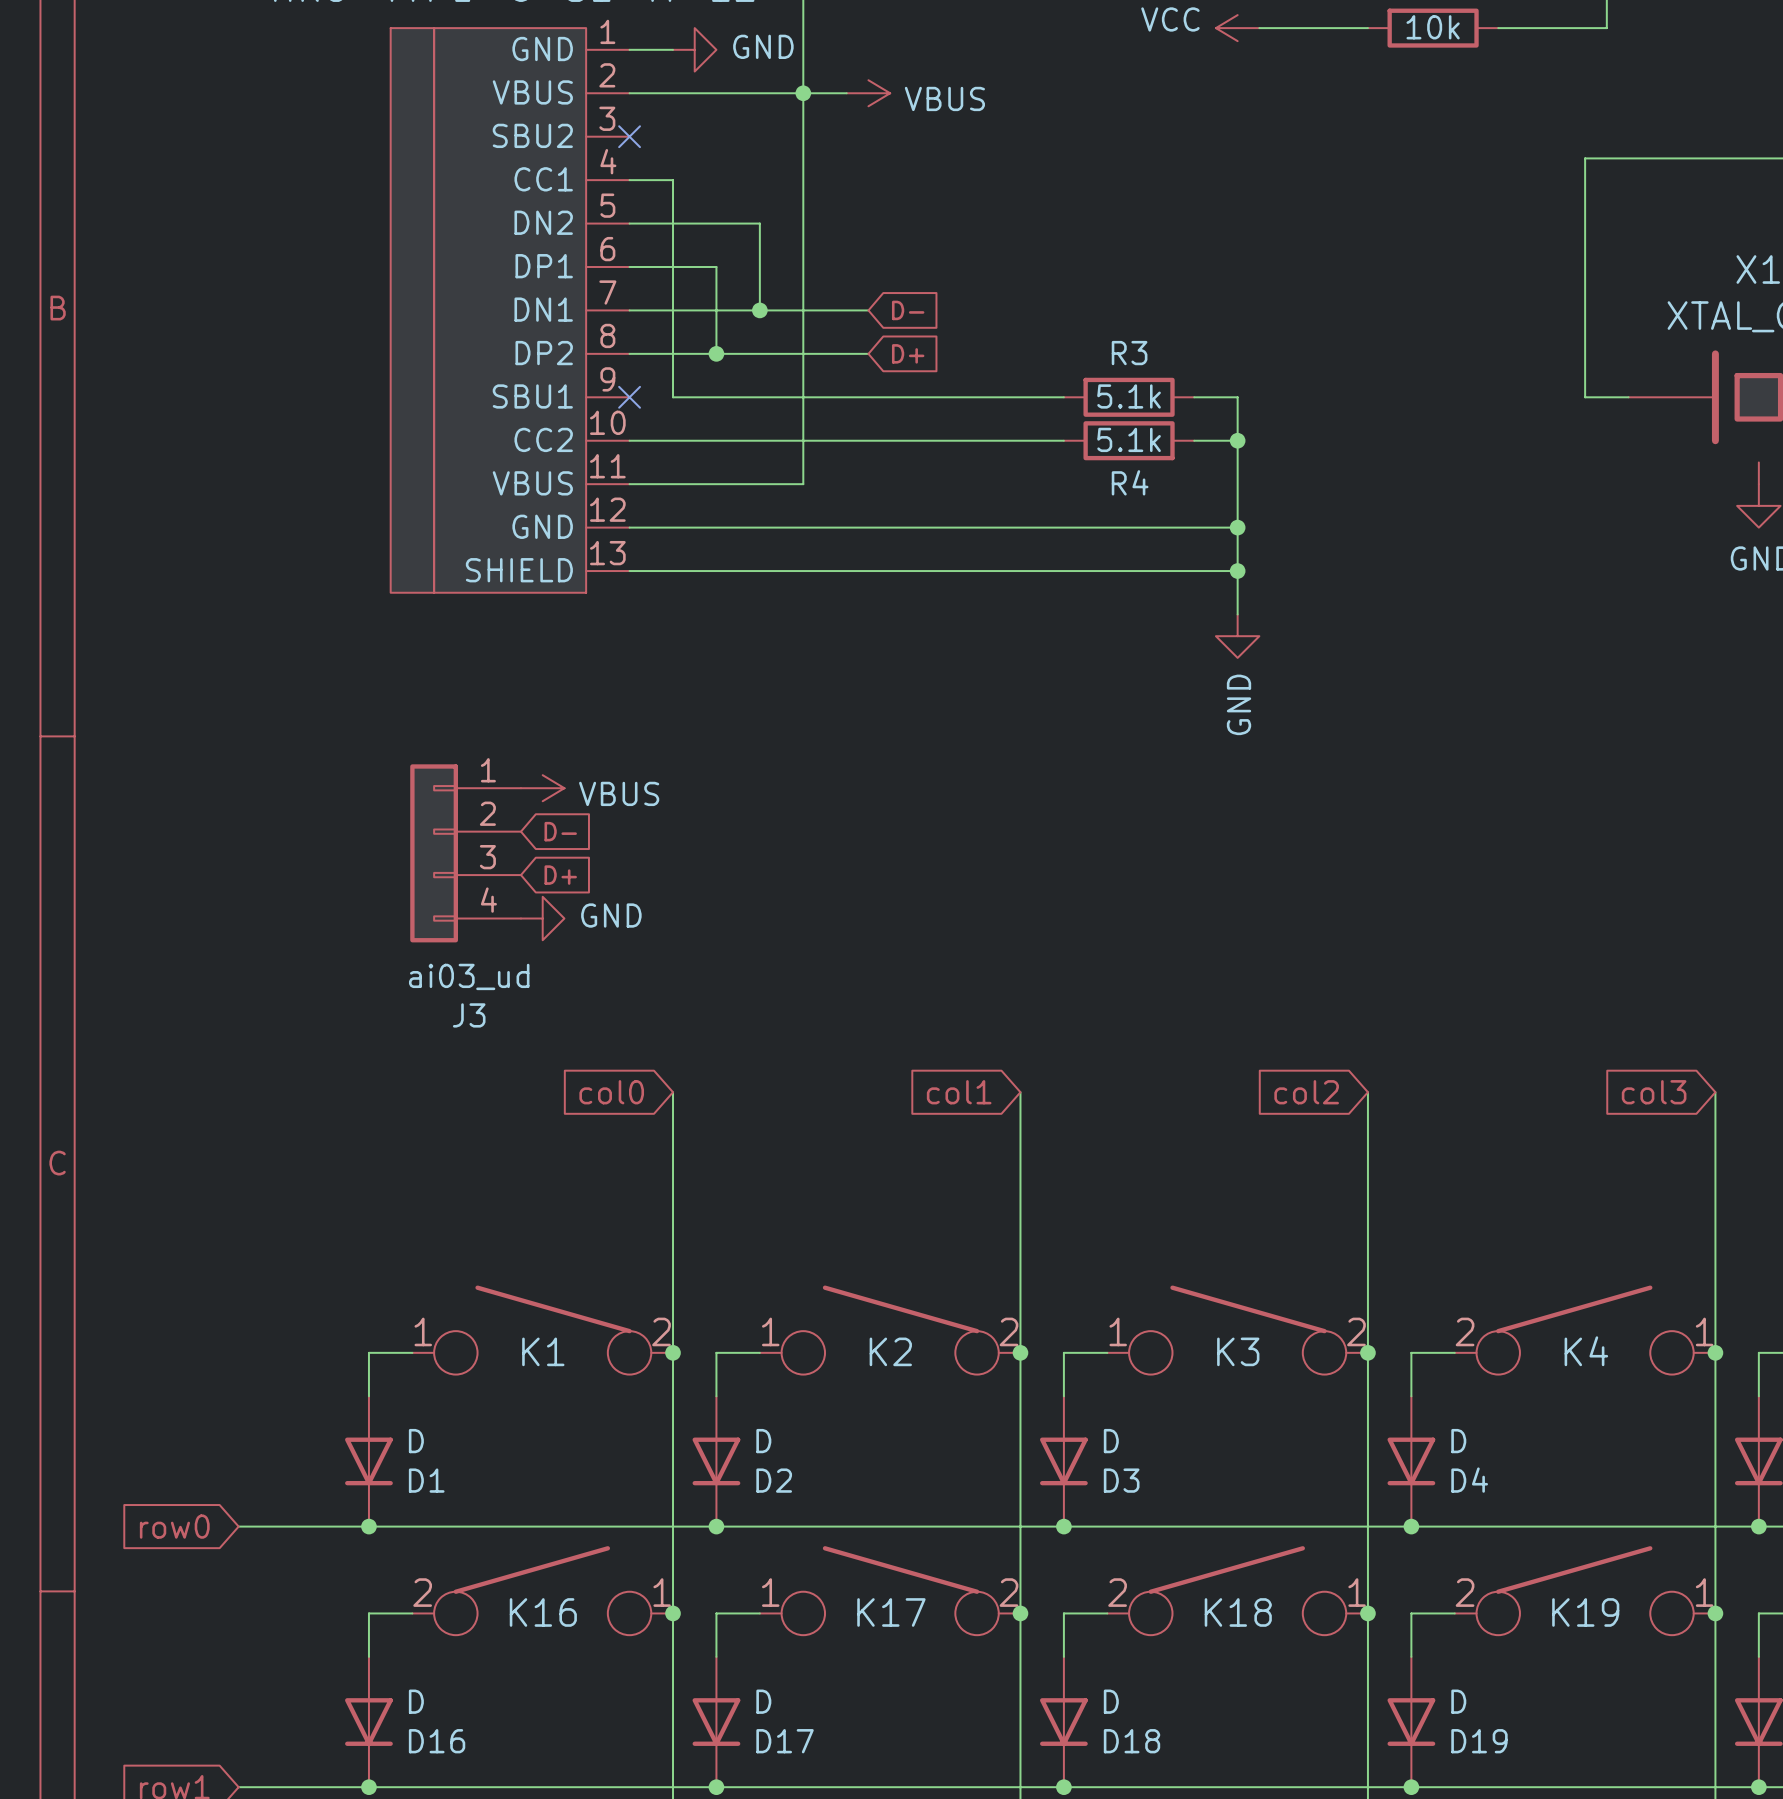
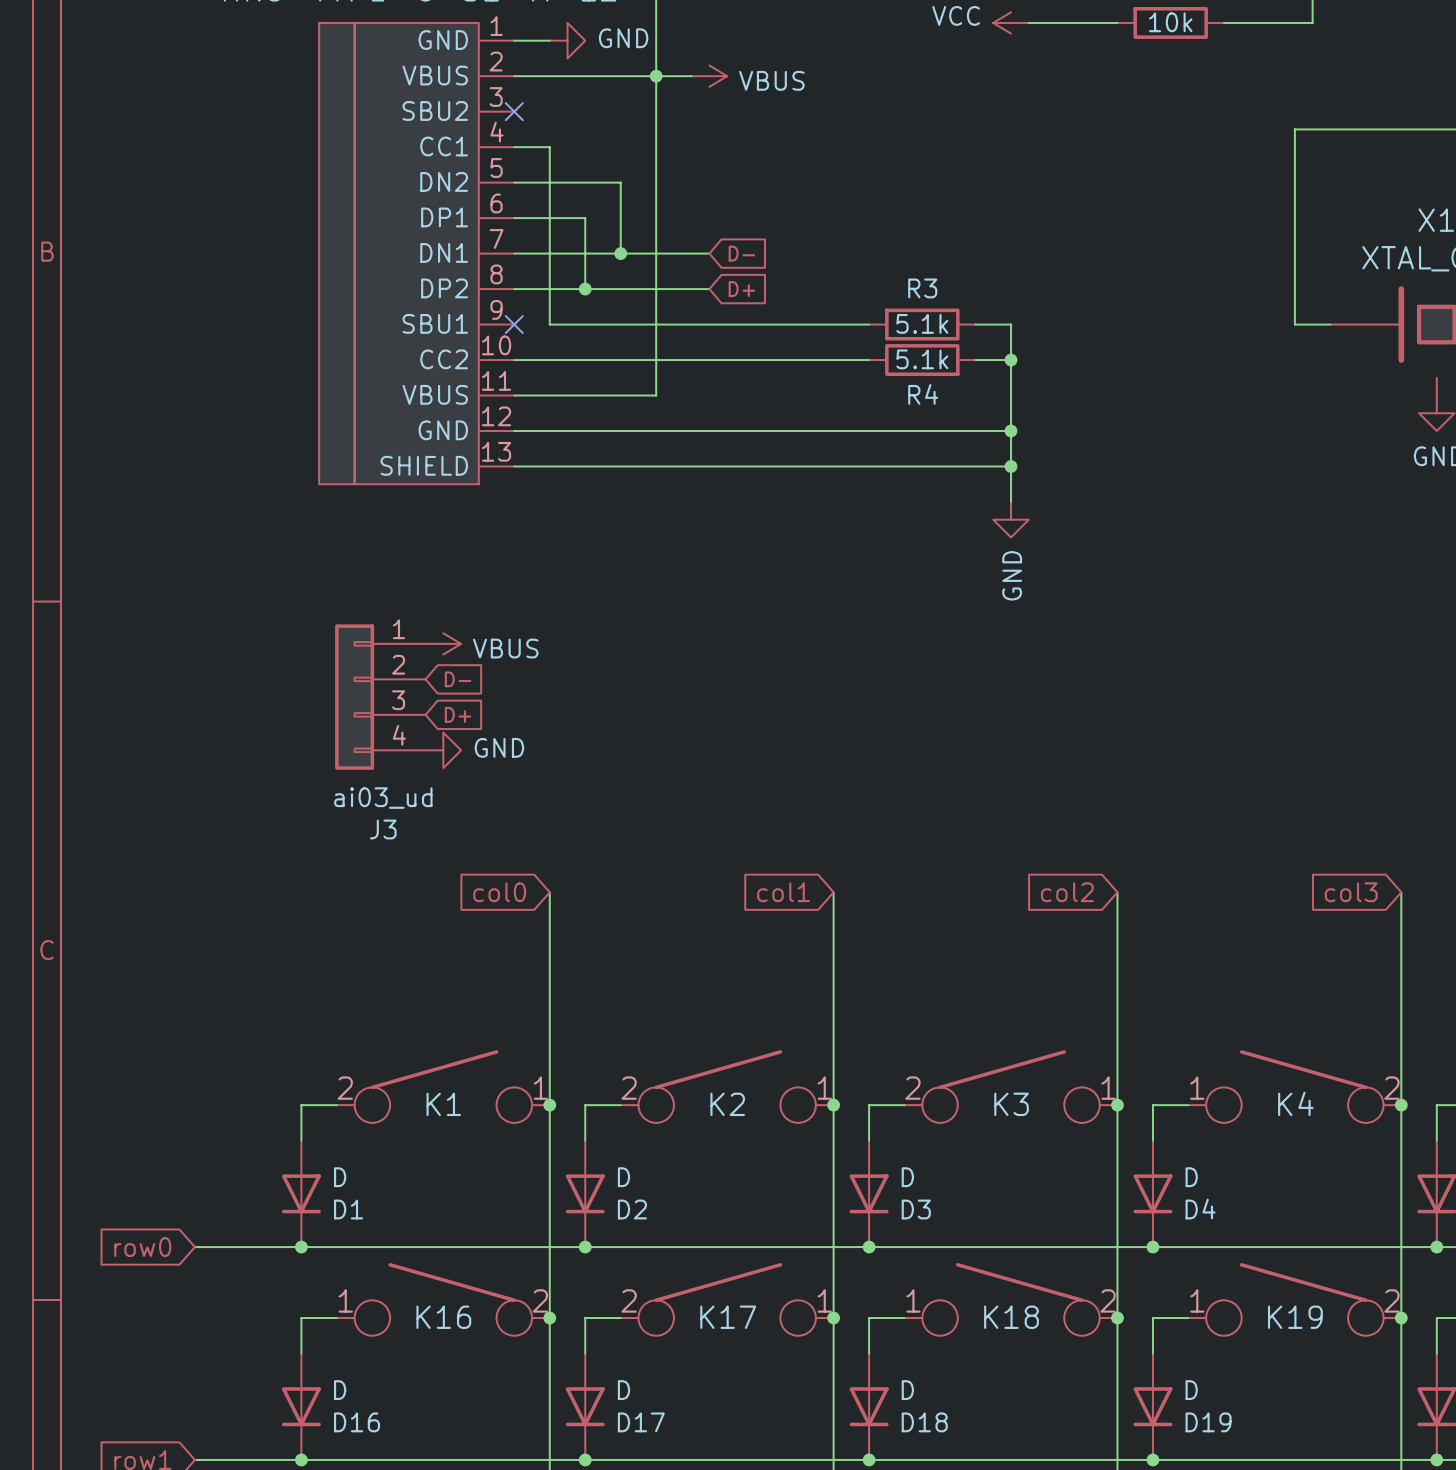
K1 flip: as is (542, 1330) -> left-right (443, 1086)
K2 flip: as is (890, 1330) -> left-right (727, 1086)
K3 flip: as is (1237, 1330) -> left-right (1011, 1086)
K4 flip: as is (1585, 1330) -> left-right (1294, 1086)
K16 flip: as is (542, 1590) -> left-right (443, 1299)
K17 flip: as is (890, 1590) -> left-right (727, 1299)
K18 flip: as is (1237, 1590) -> left-right (1011, 1299)
K19 flip: as is (1585, 1590) -> left-right (1294, 1299)

